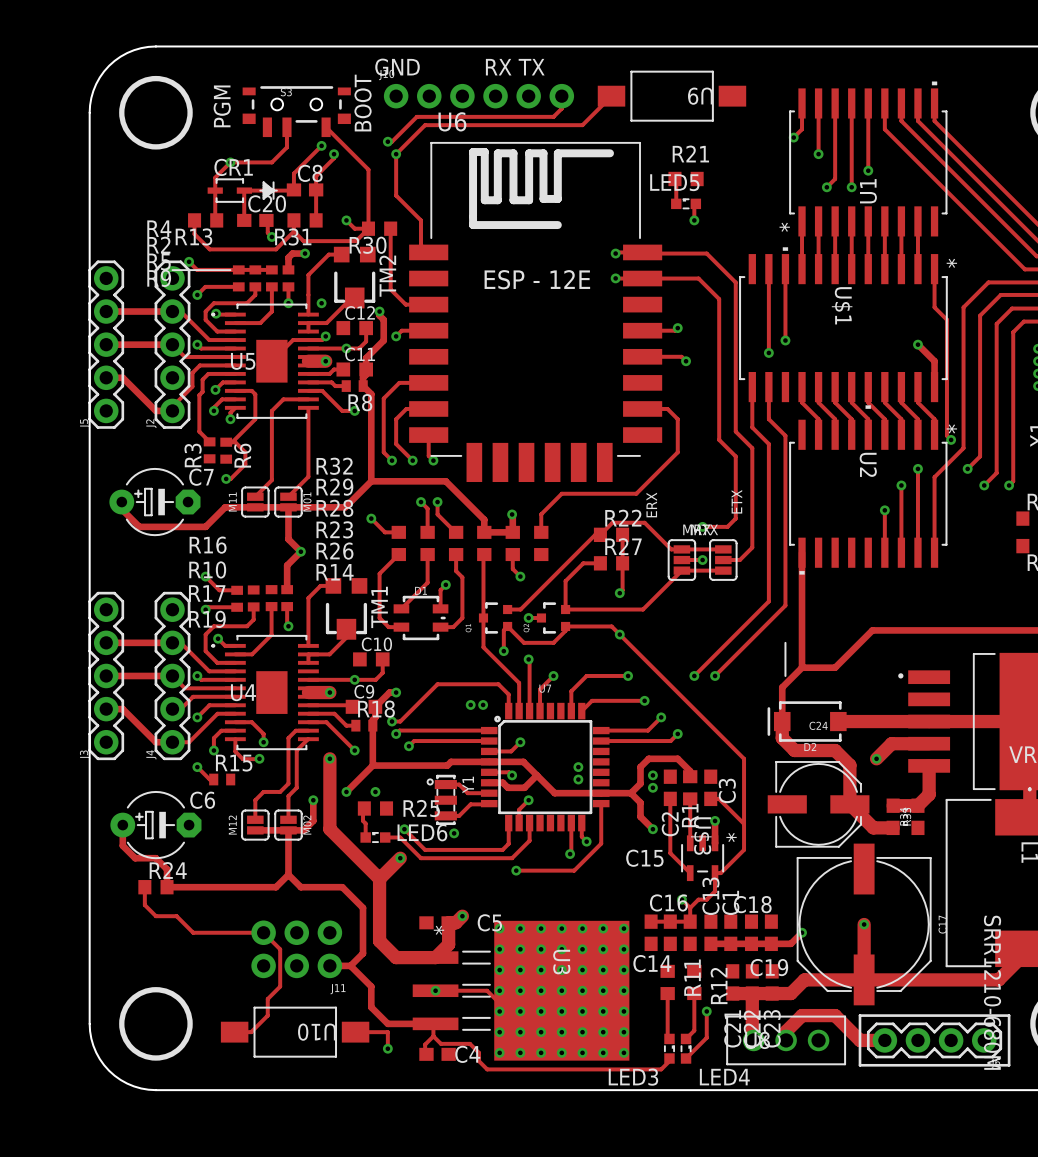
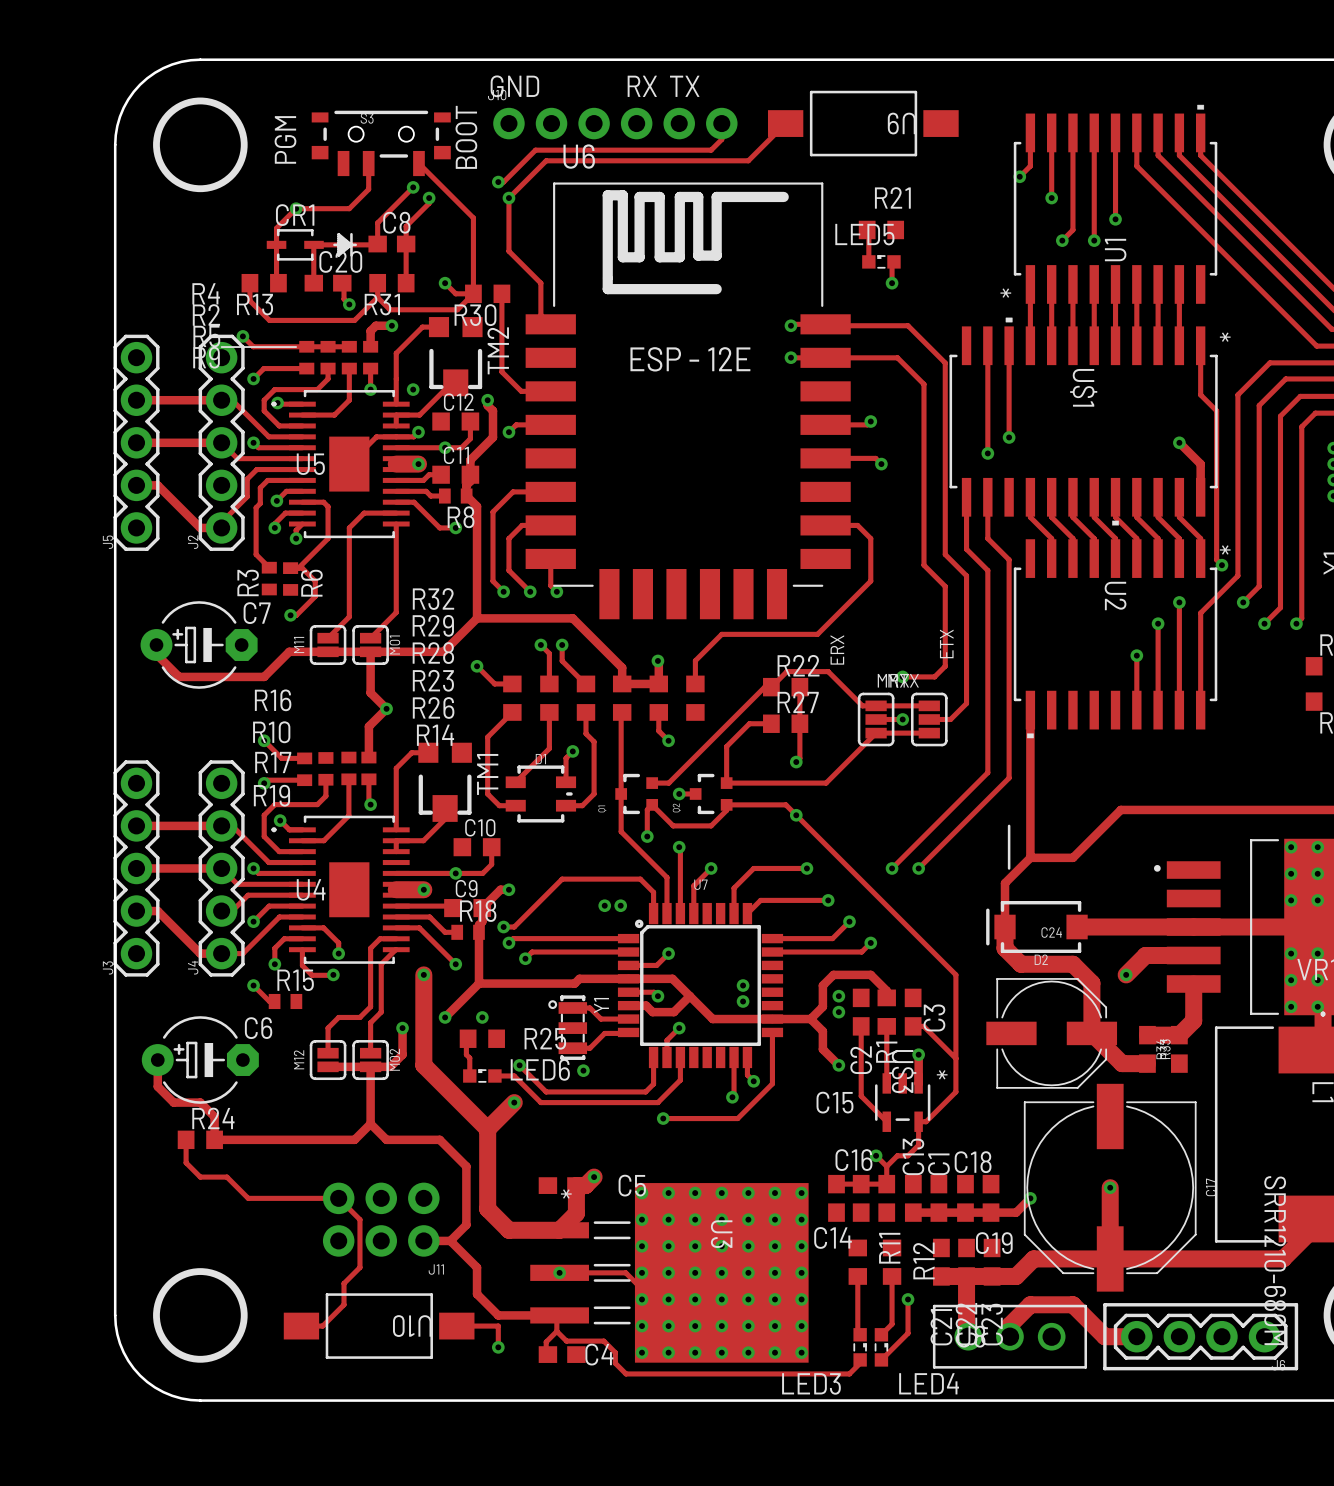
via: none -> (1291, 847)
via: none -> (1317, 847)
via: none -> (1291, 873)
via: none -> (1317, 873)
via: none -> (1291, 900)
via: none -> (1317, 900)
via: none -> (1291, 953)
via: none -> (1317, 953)
via: none -> (1291, 980)
via: none -> (1317, 980)
via: none -> (1291, 1006)
via: none -> (1317, 1006)

